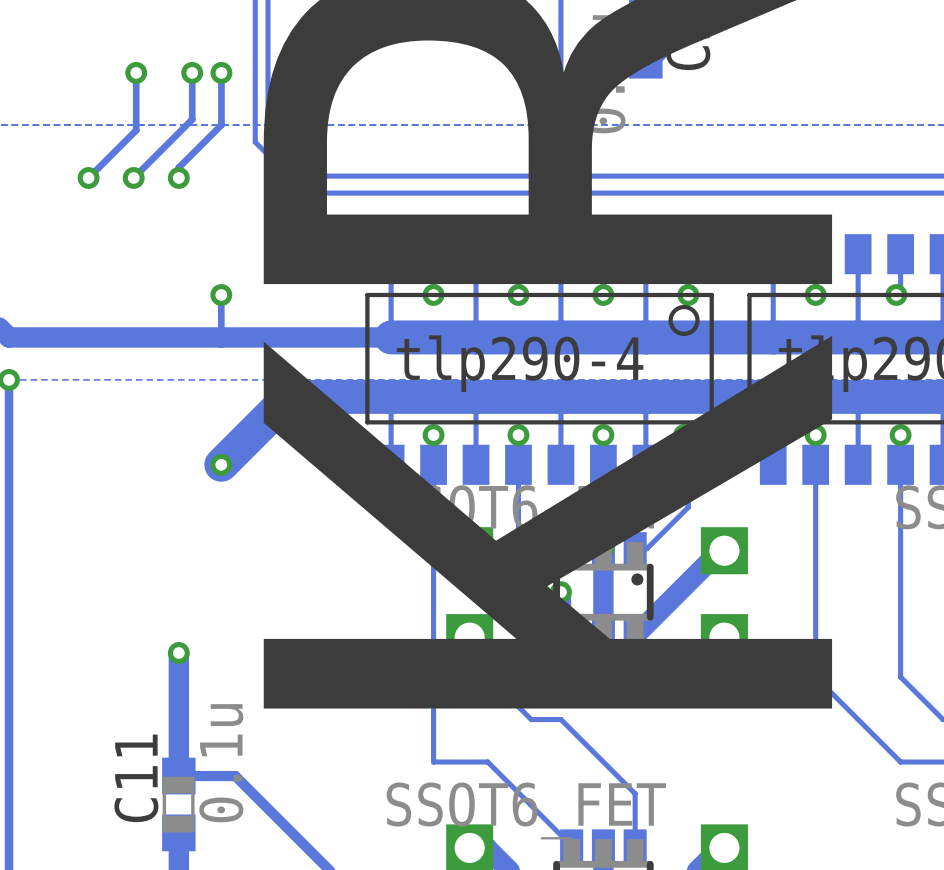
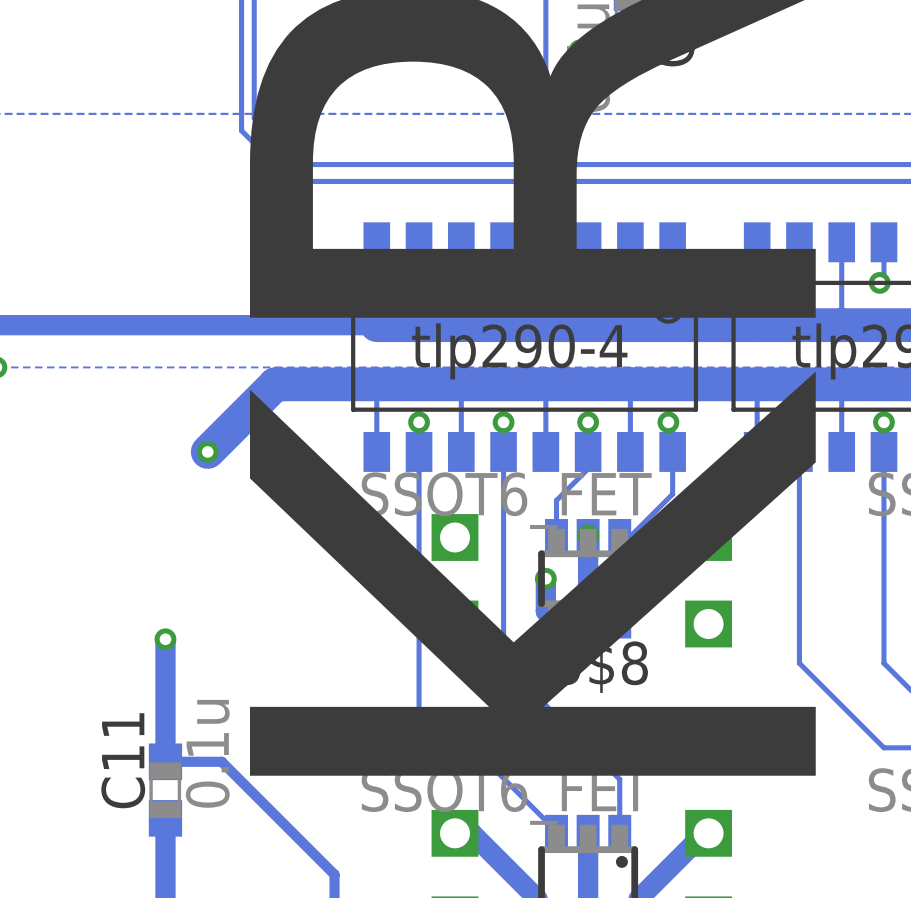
track: (136, 72) (136, 130) (88, 177) -> none
via: (136, 72) -> none
track: (192, 72) (192, 119) (133, 177) -> none
via: (192, 72) -> none
track: (221, 72) (221, 124) (178, 167) (178, 177) -> none
via: (221, 72) -> none
via: (88, 177) -> none
via: (133, 177) -> none
via: (178, 177) -> none
track: (221, 294) (221, 337) -> none
via: (221, 294) -> none

